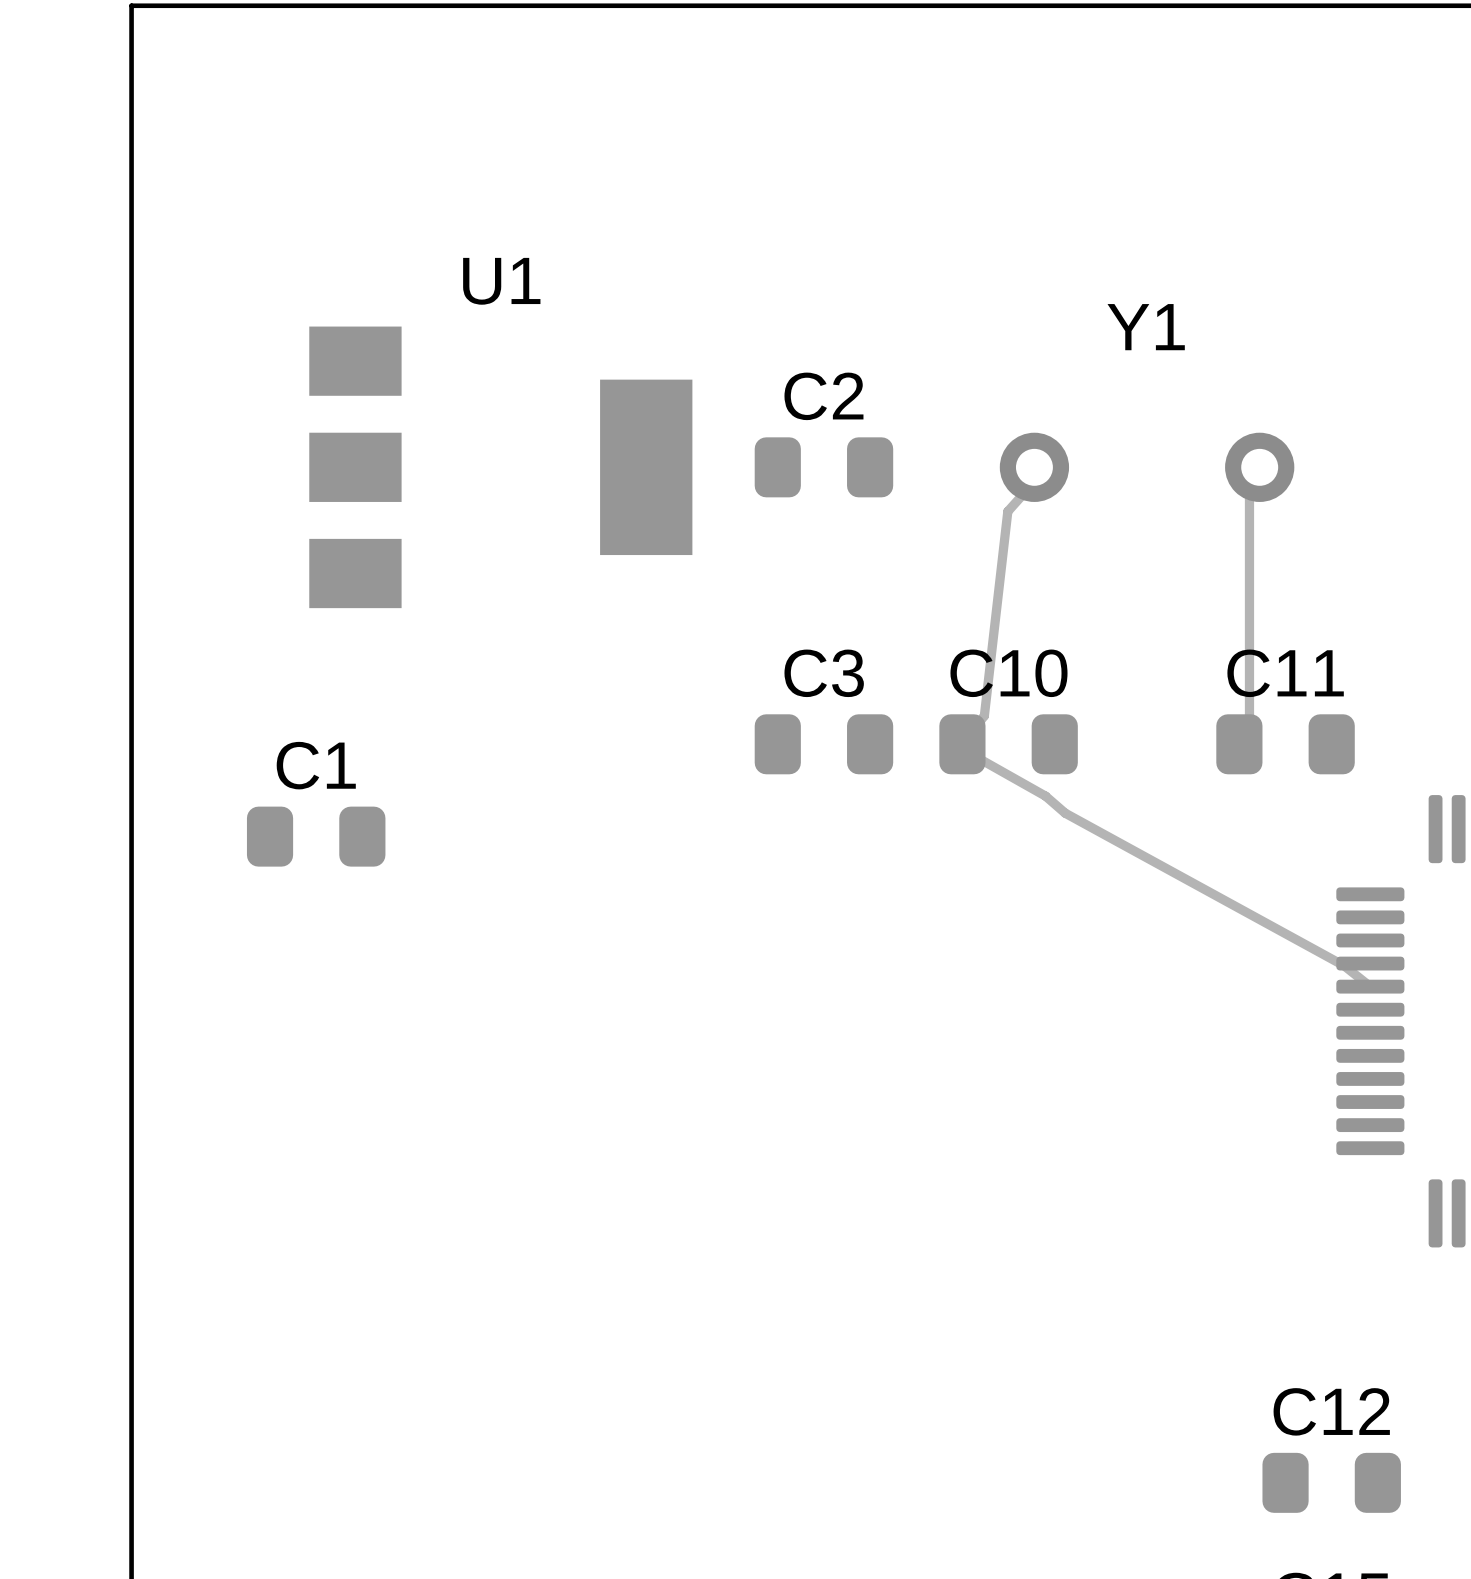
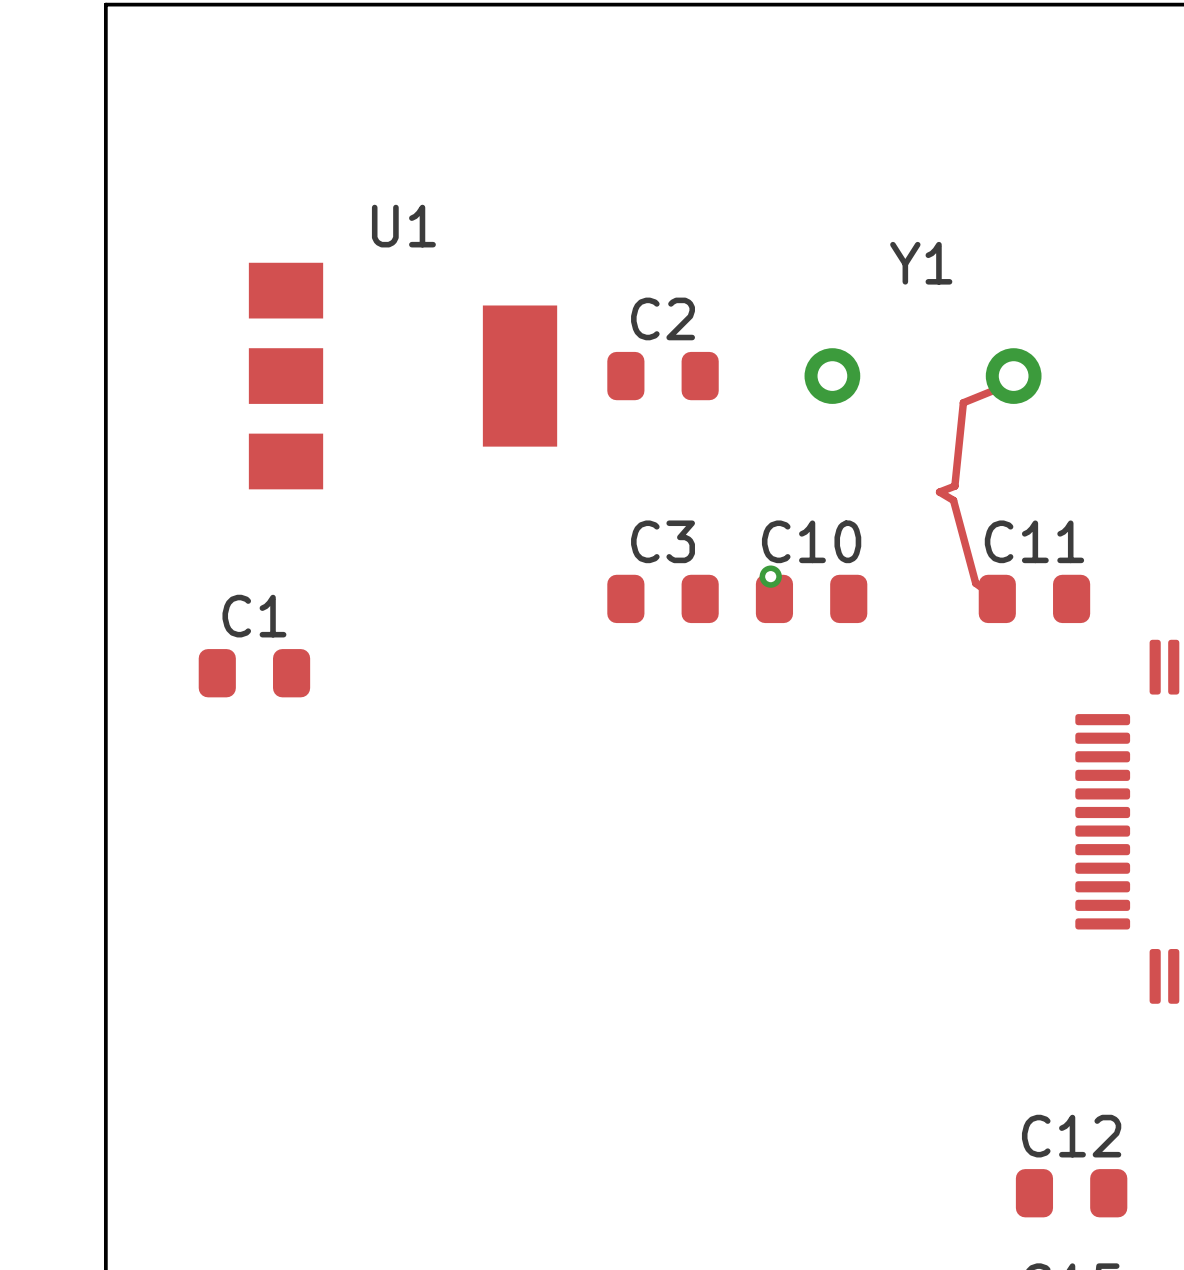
track: (1034, 467) (1028, 488) (1007, 511) (984, 715) (962, 744) (972, 754) (1045, 796) (1065, 813) (1344, 965) (1370, 986) -> none
track: (1259, 467) (1249, 498) (1249, 715) (1239, 744) -> (1013, 376) (1006, 374) (1005, 385) (963, 402) (954, 486) (939, 492) (953, 500) (975, 583) (997, 598)
via: none -> (770, 576)

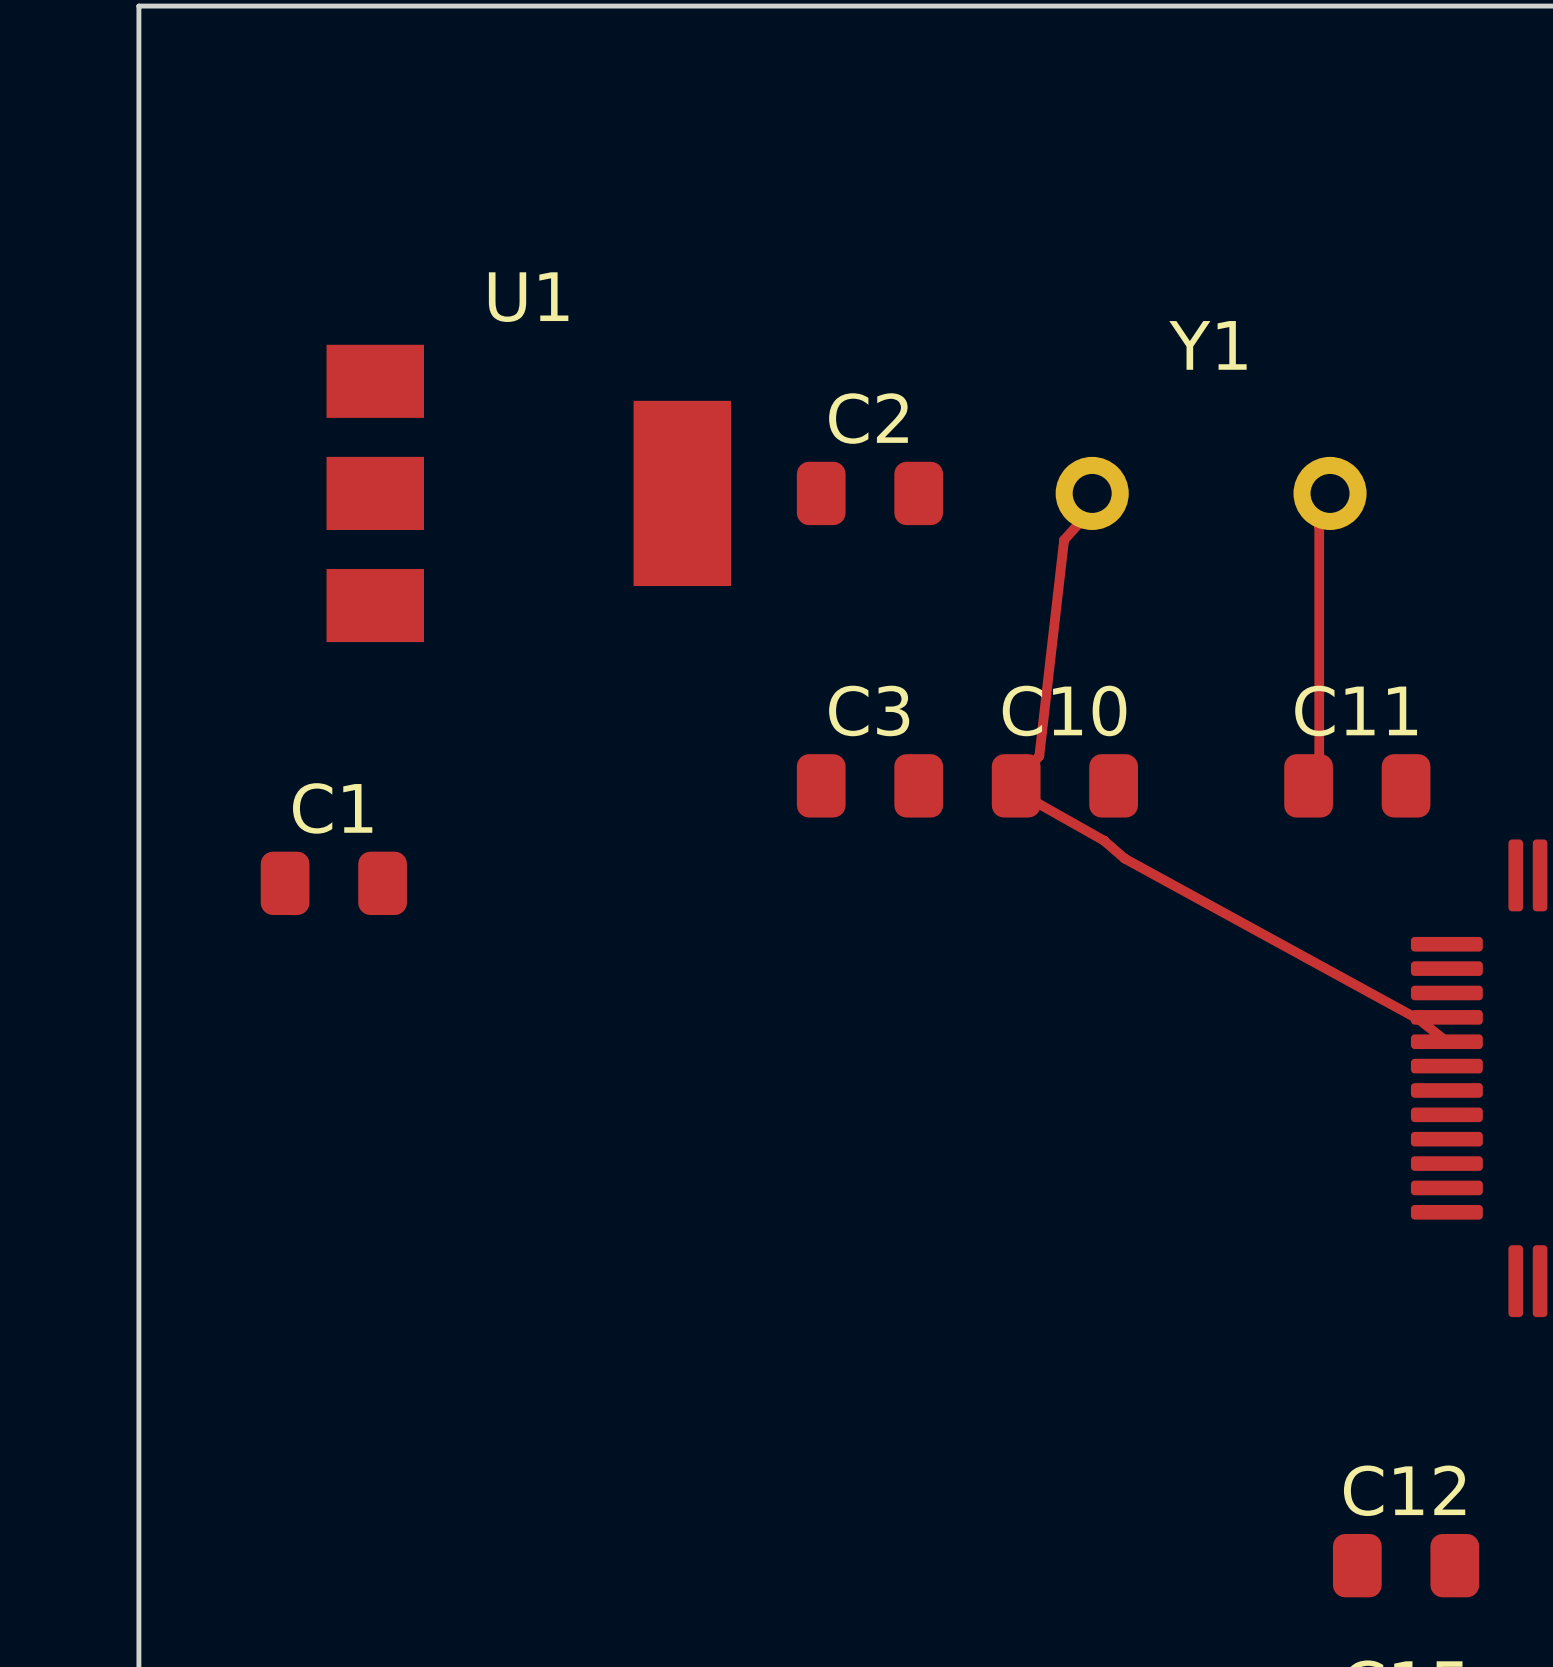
track: none -> (1092, 493) (1085, 515) (1064, 540) (1039, 755) (1016, 785) (1026, 796) (1104, 840) (1124, 858) (1419, 1019) (1446, 1041)
track: (1013, 376) (1006, 374) (1005, 385) (963, 402) (954, 486) (939, 492) (953, 500) (975, 583) (997, 598) -> (1330, 493) (1319, 526) (1319, 755) (1308, 785)
via: (770, 576) -> none

